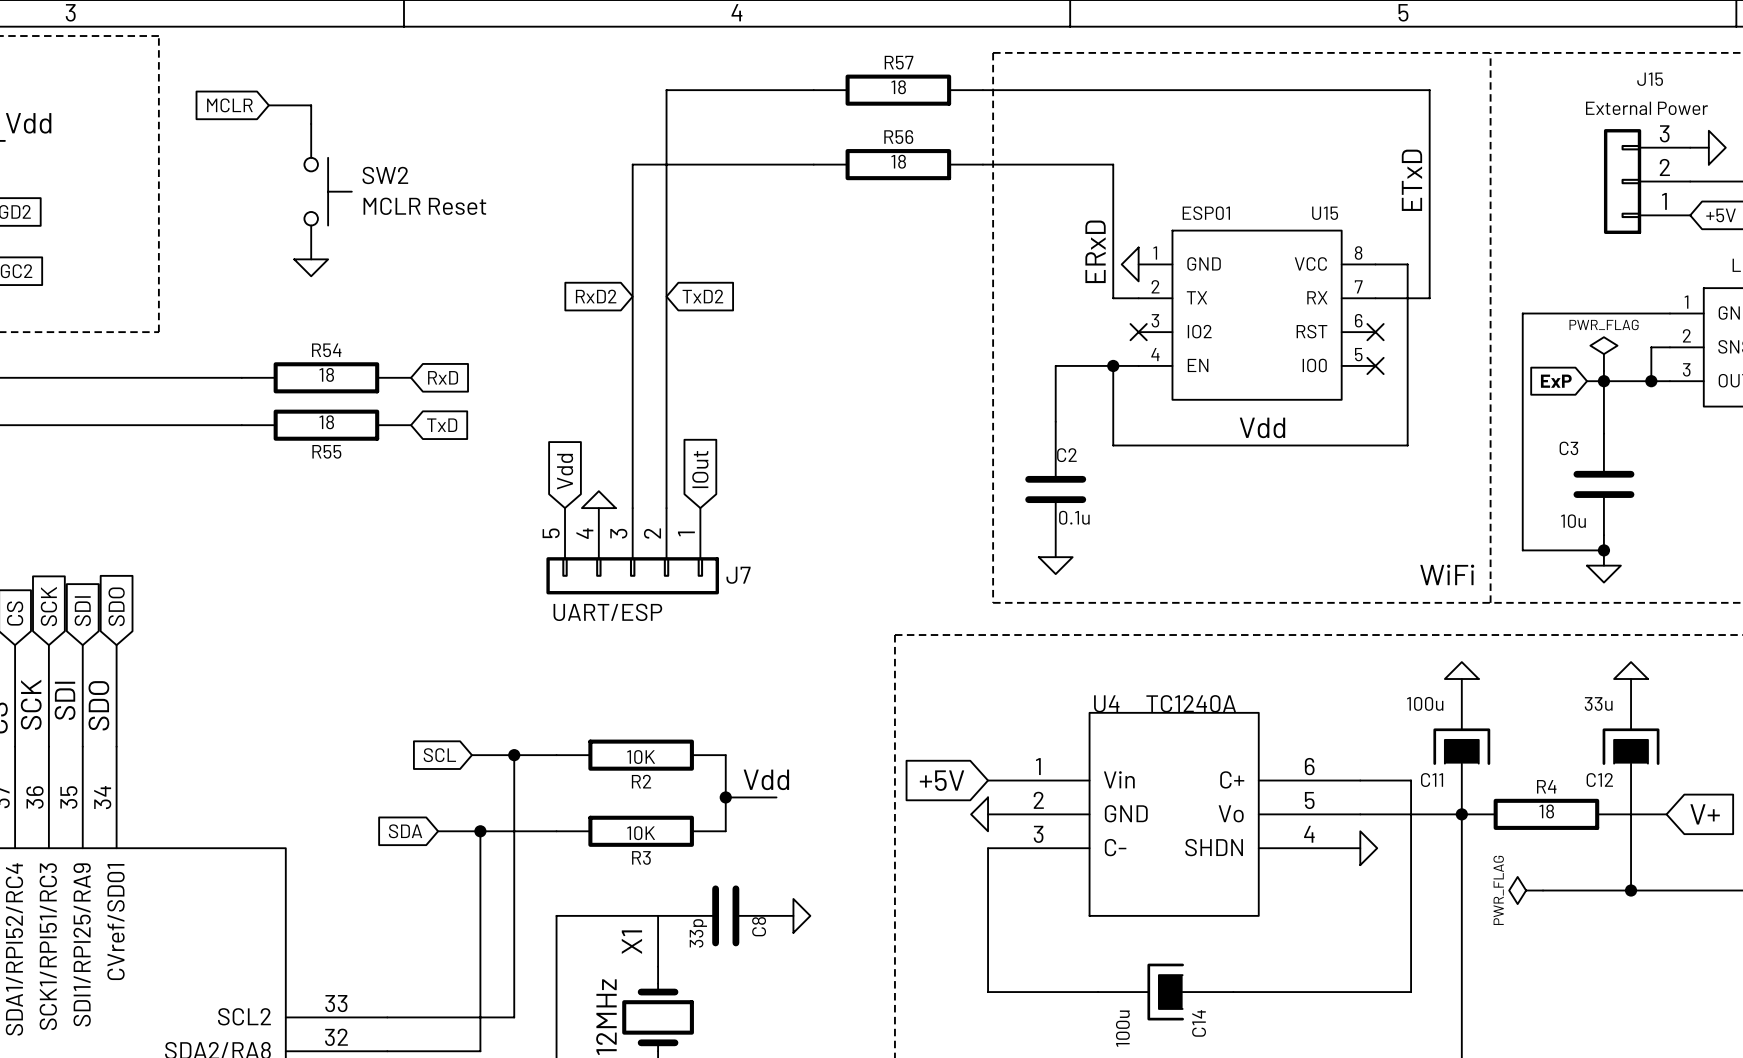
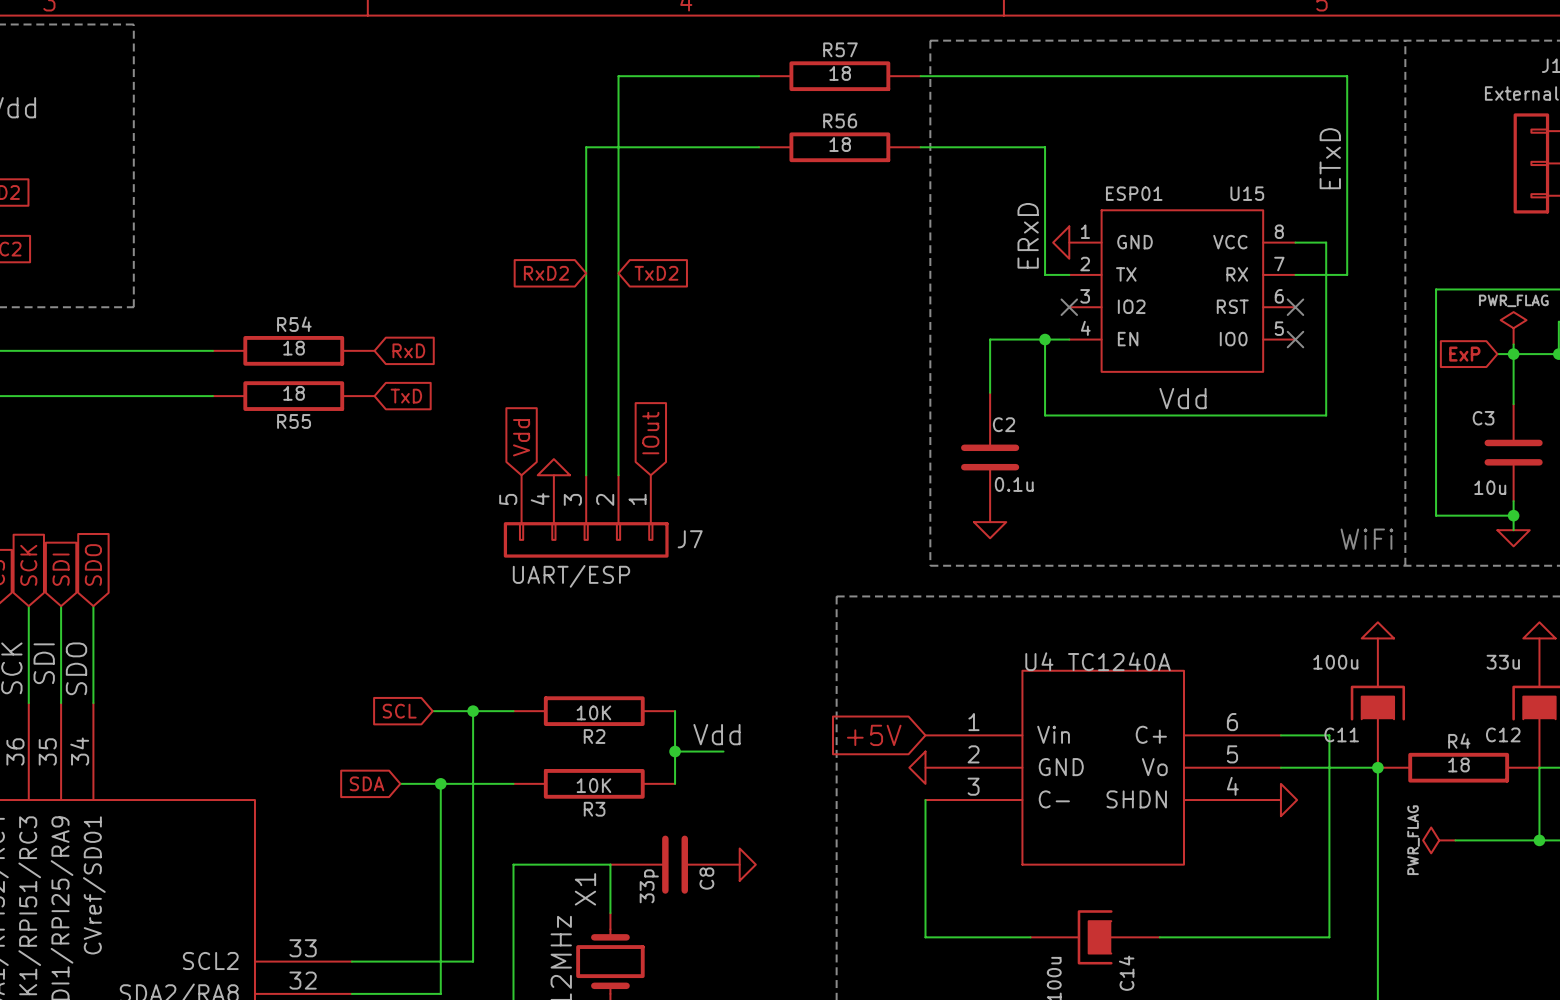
global label: MCLR (229, 105) -> none
wire: (268, 105) (311, 105) (311, 123) -> none
SW2: MCLR Reset (328, 191) -> none
power symbol: (311, 267) -> none

